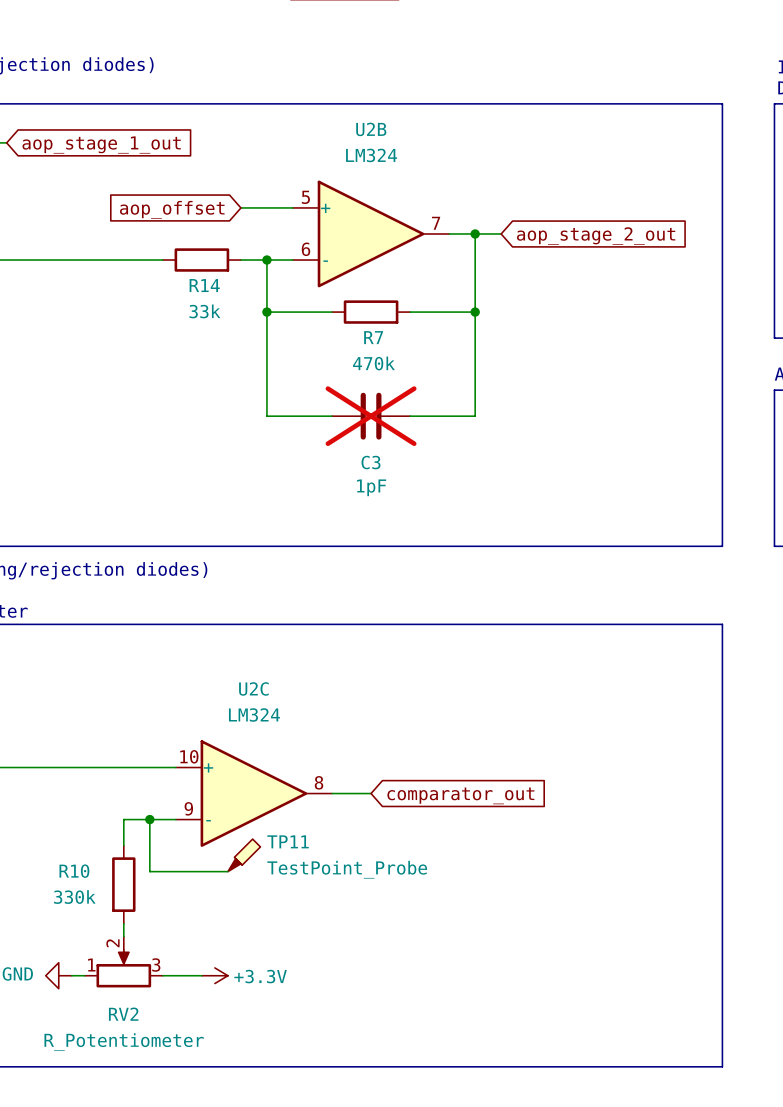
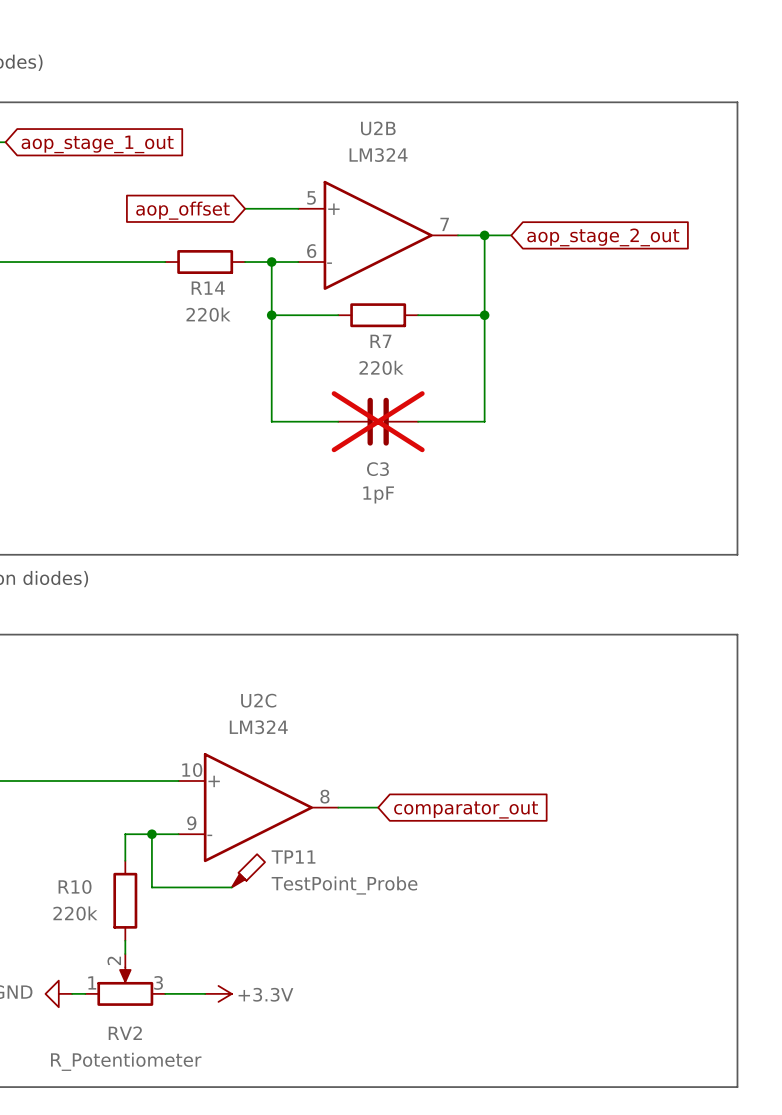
R14 value: 33k (204, 311) -> 220k (208, 314)
R7 value: 470k (373, 363) -> 220k (381, 367)
R10 value: 330k (74, 897) -> 220k (75, 913)

